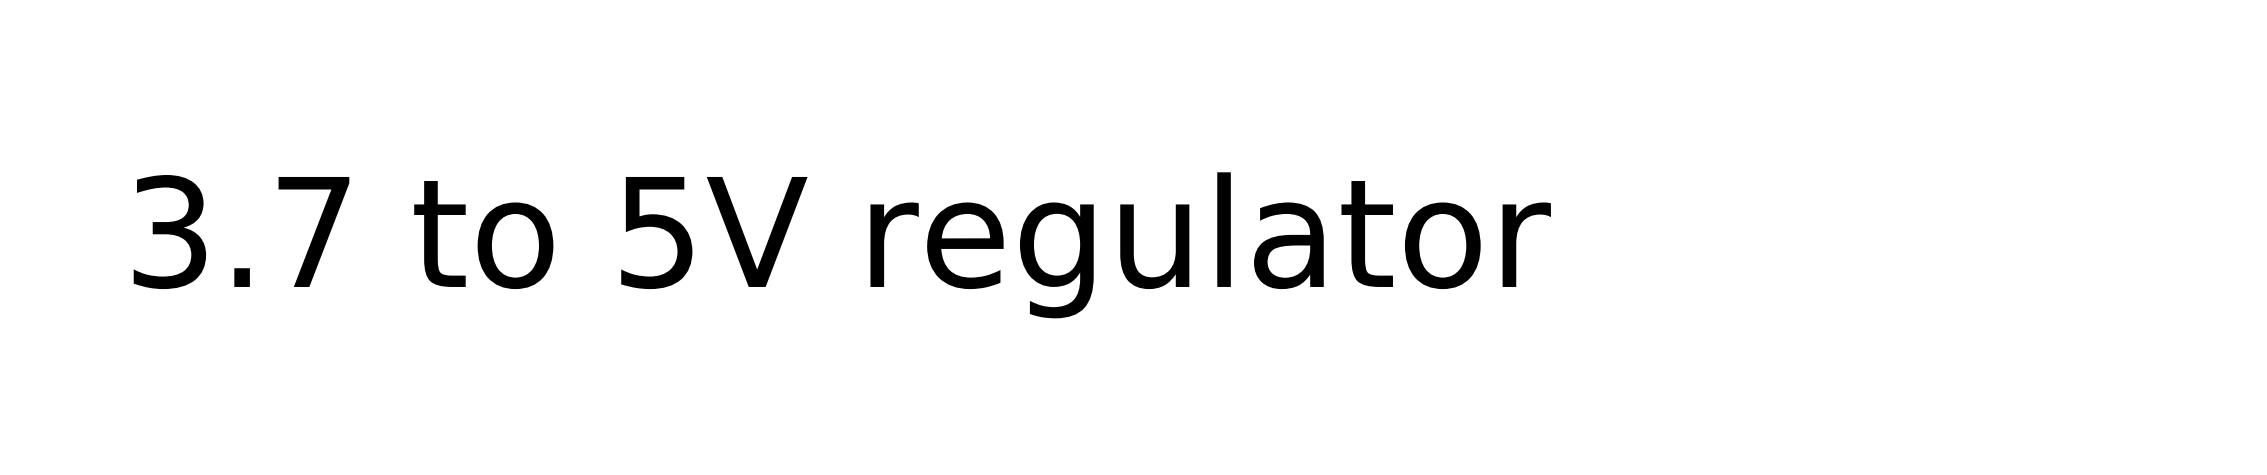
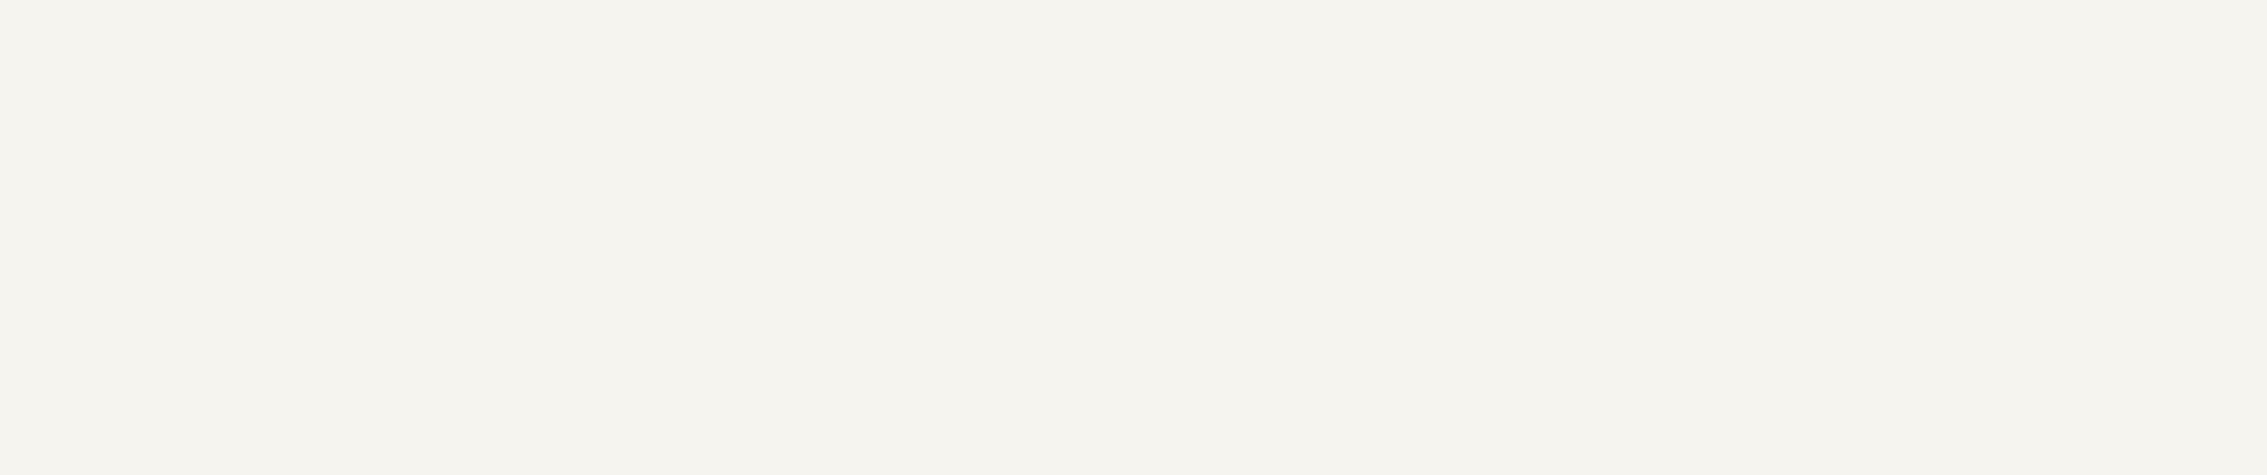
label: 3.7 to 5V regulator (842, 245) -> none

